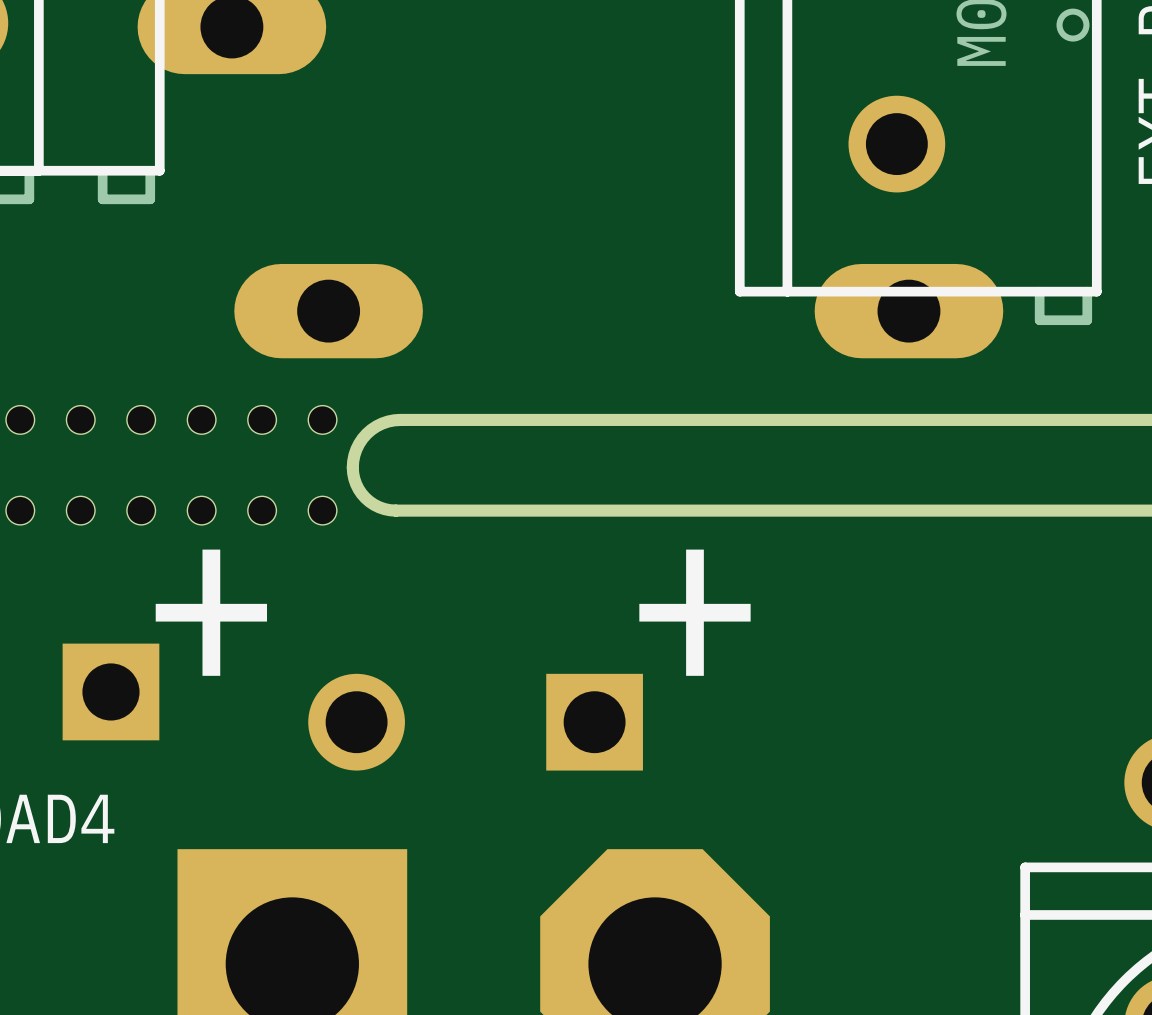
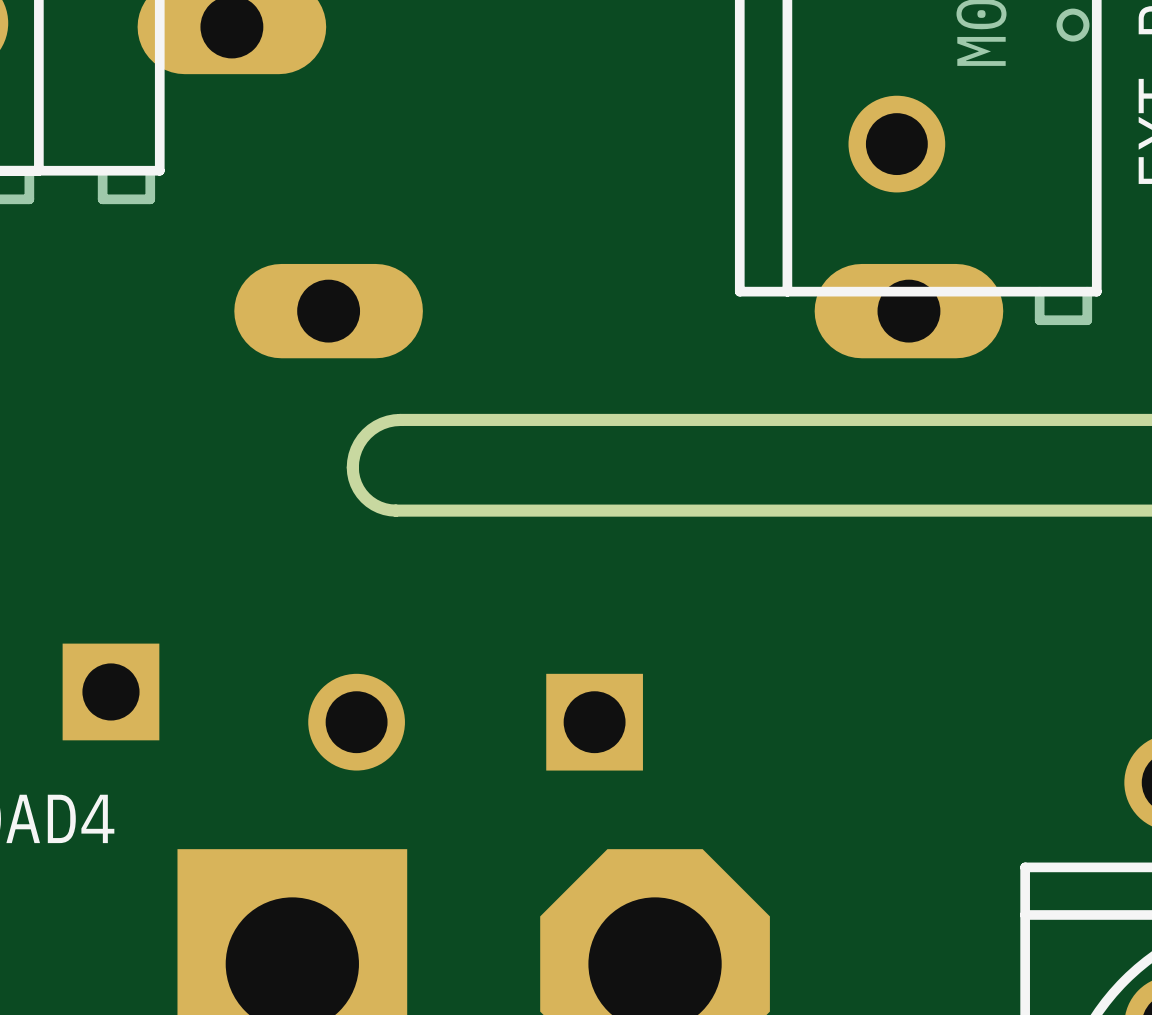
hole: (20, 419) -> none
hole: (80, 419) -> none
hole: (141, 419) -> none
hole: (201, 419) -> none
hole: (262, 419) -> none
hole: (322, 419) -> none
hole: (20, 510) -> none
hole: (80, 510) -> none
hole: (141, 510) -> none
hole: (201, 510) -> none
hole: (262, 510) -> none
hole: (322, 510) -> none
text: + (211, 612) -> none
text: + (694, 612) -> none

